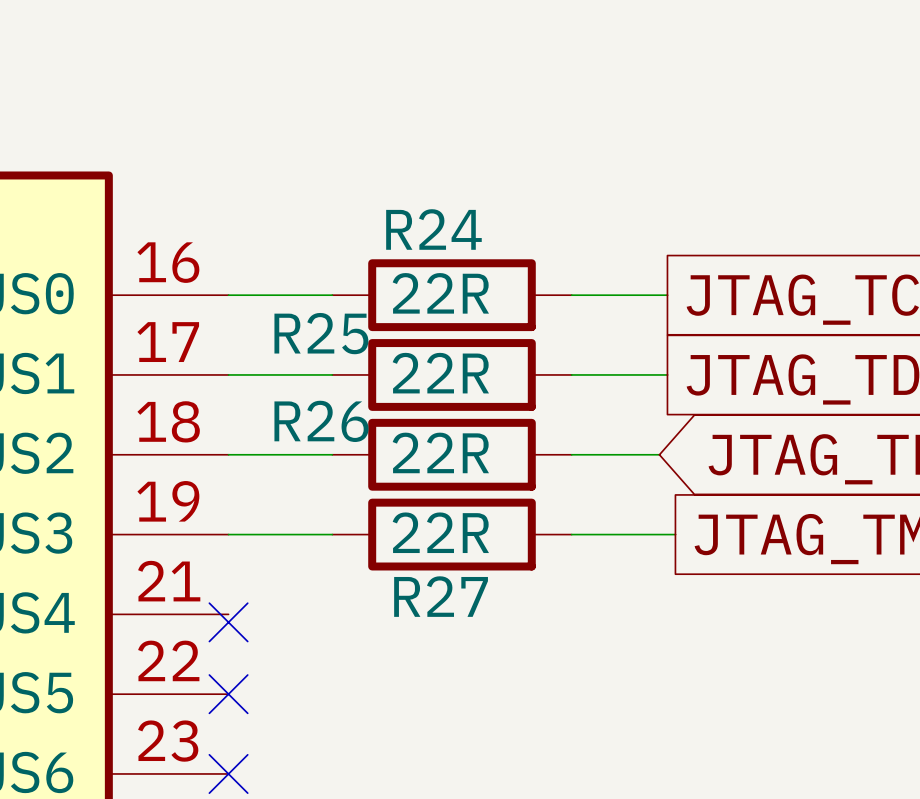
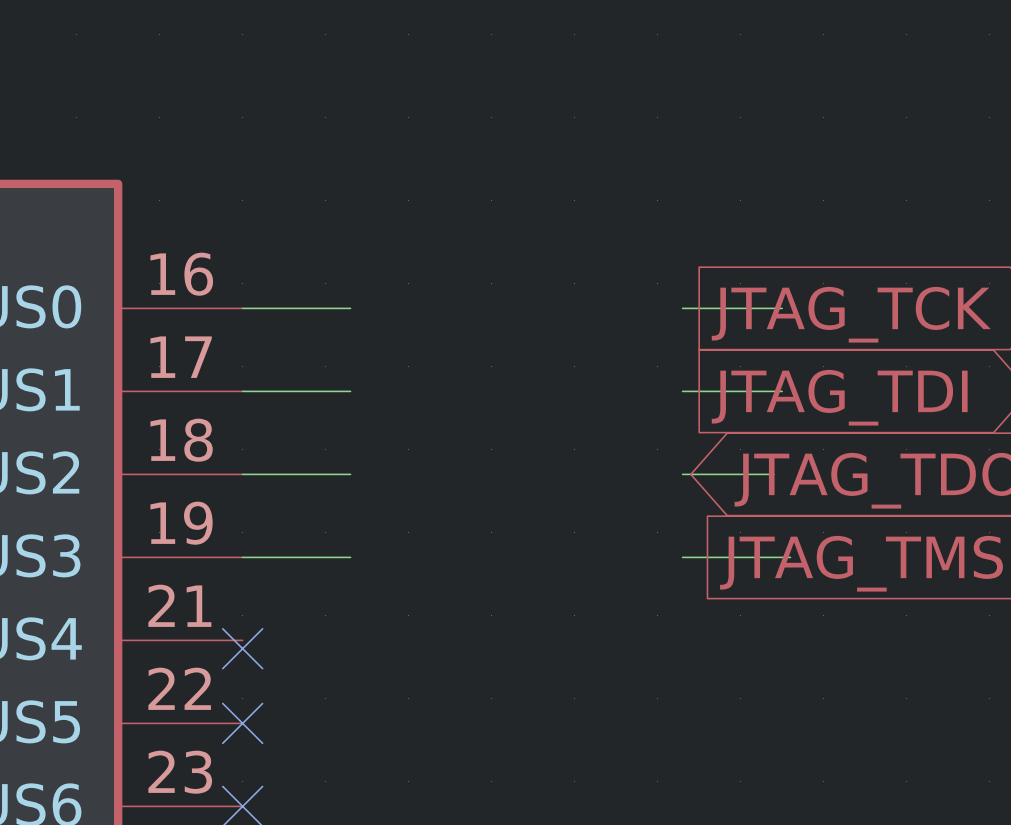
R24: 22R (452, 295) -> none
wire: (571, 295) (651, 295) -> (699, 308) (782, 308)
R25: 22R (452, 374) -> none
wire: (571, 374) (651, 374) -> (699, 391) (782, 391)
R26: 22R (452, 454) -> none
wire: (571, 454) (651, 454) -> (690, 474) (773, 474)
R27: 22R (452, 534) -> none
wire: (571, 534) (651, 534) -> (707, 557) (790, 557)

